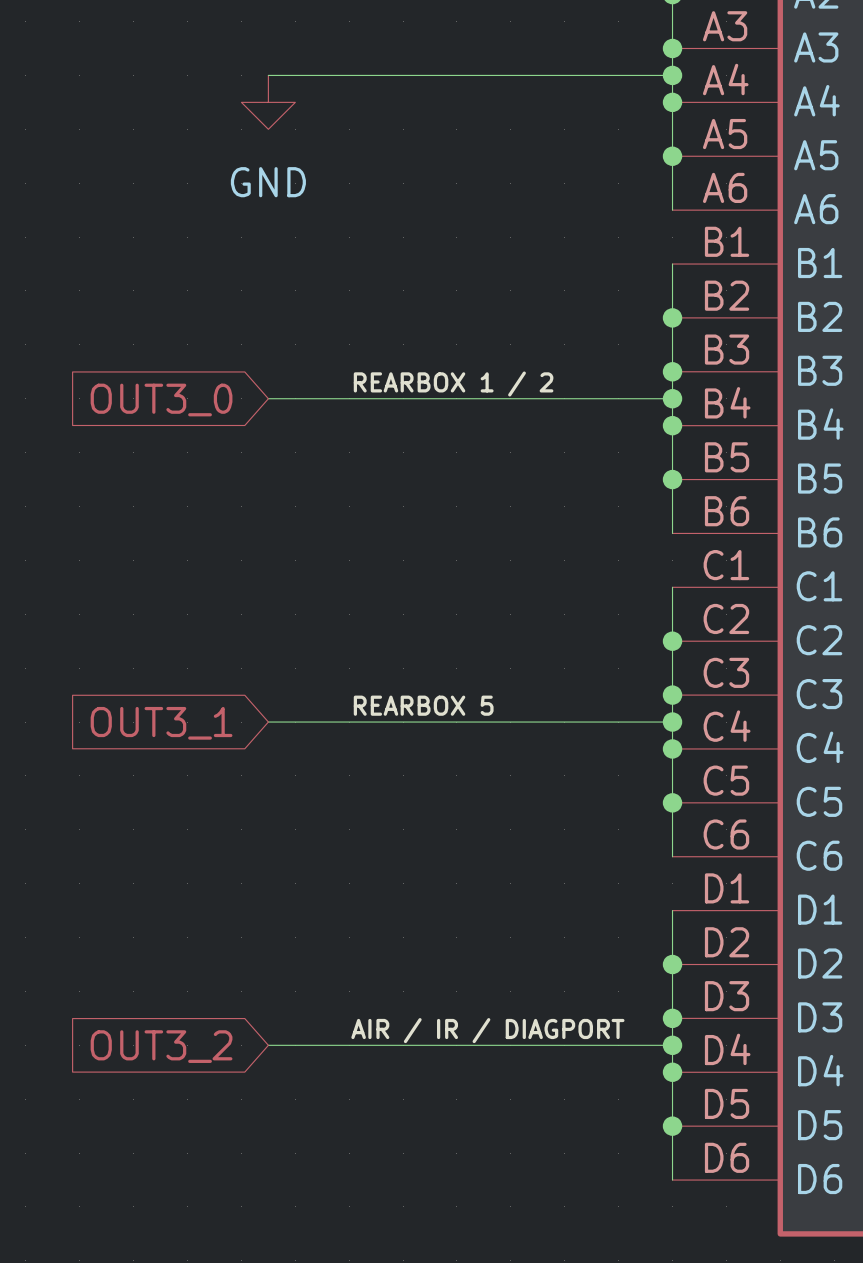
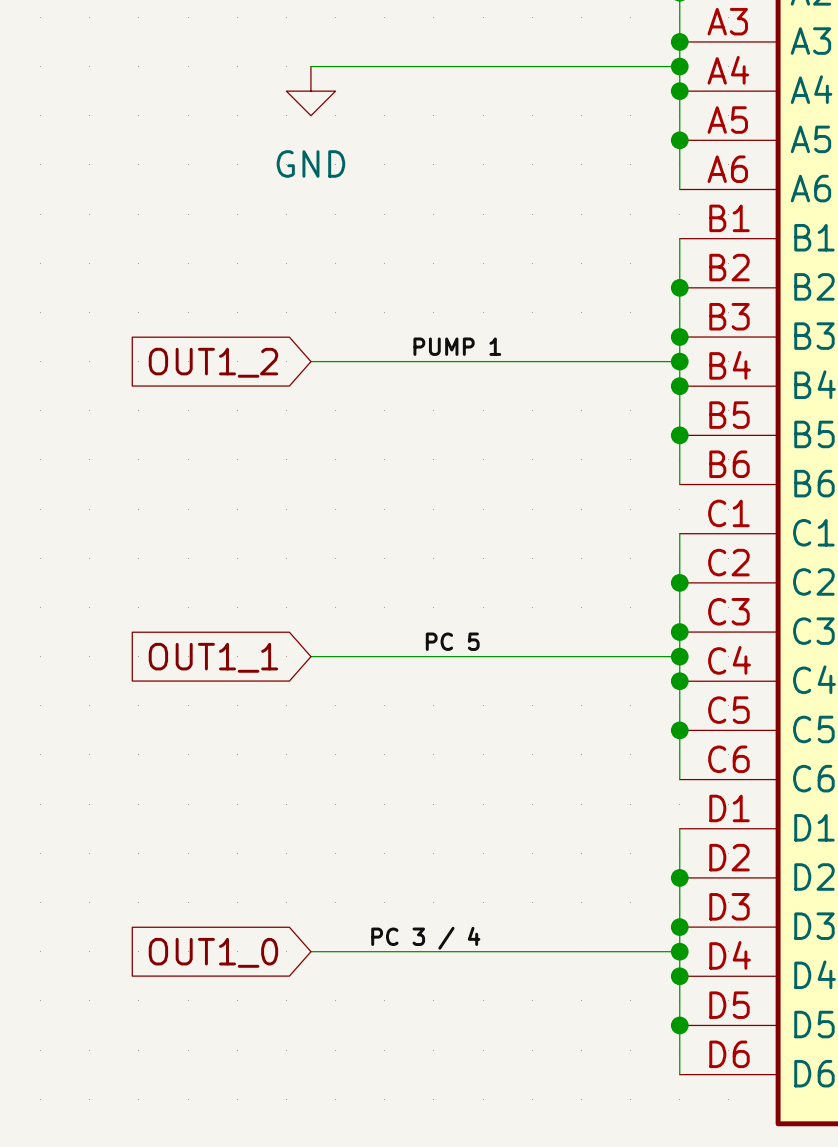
label: none -> PUMP 1 (457, 346)
label: REARBOX 1 / 2 (453, 384) -> none
global label: OUT3_0 (161, 400) -> OUT1_2 (213, 362)
label: REARBOX 5 (423, 705) -> none
label: none -> PC 5 (452, 641)
global label: OUT3_1 (161, 723) -> OUT1_1 (213, 657)
label: none -> PC 3 / 4 (425, 938)
label: AIR / IR / DIAGPORT (487, 1030) -> none
global label: OUT3_2 (161, 1046) -> OUT1_0 (213, 952)

